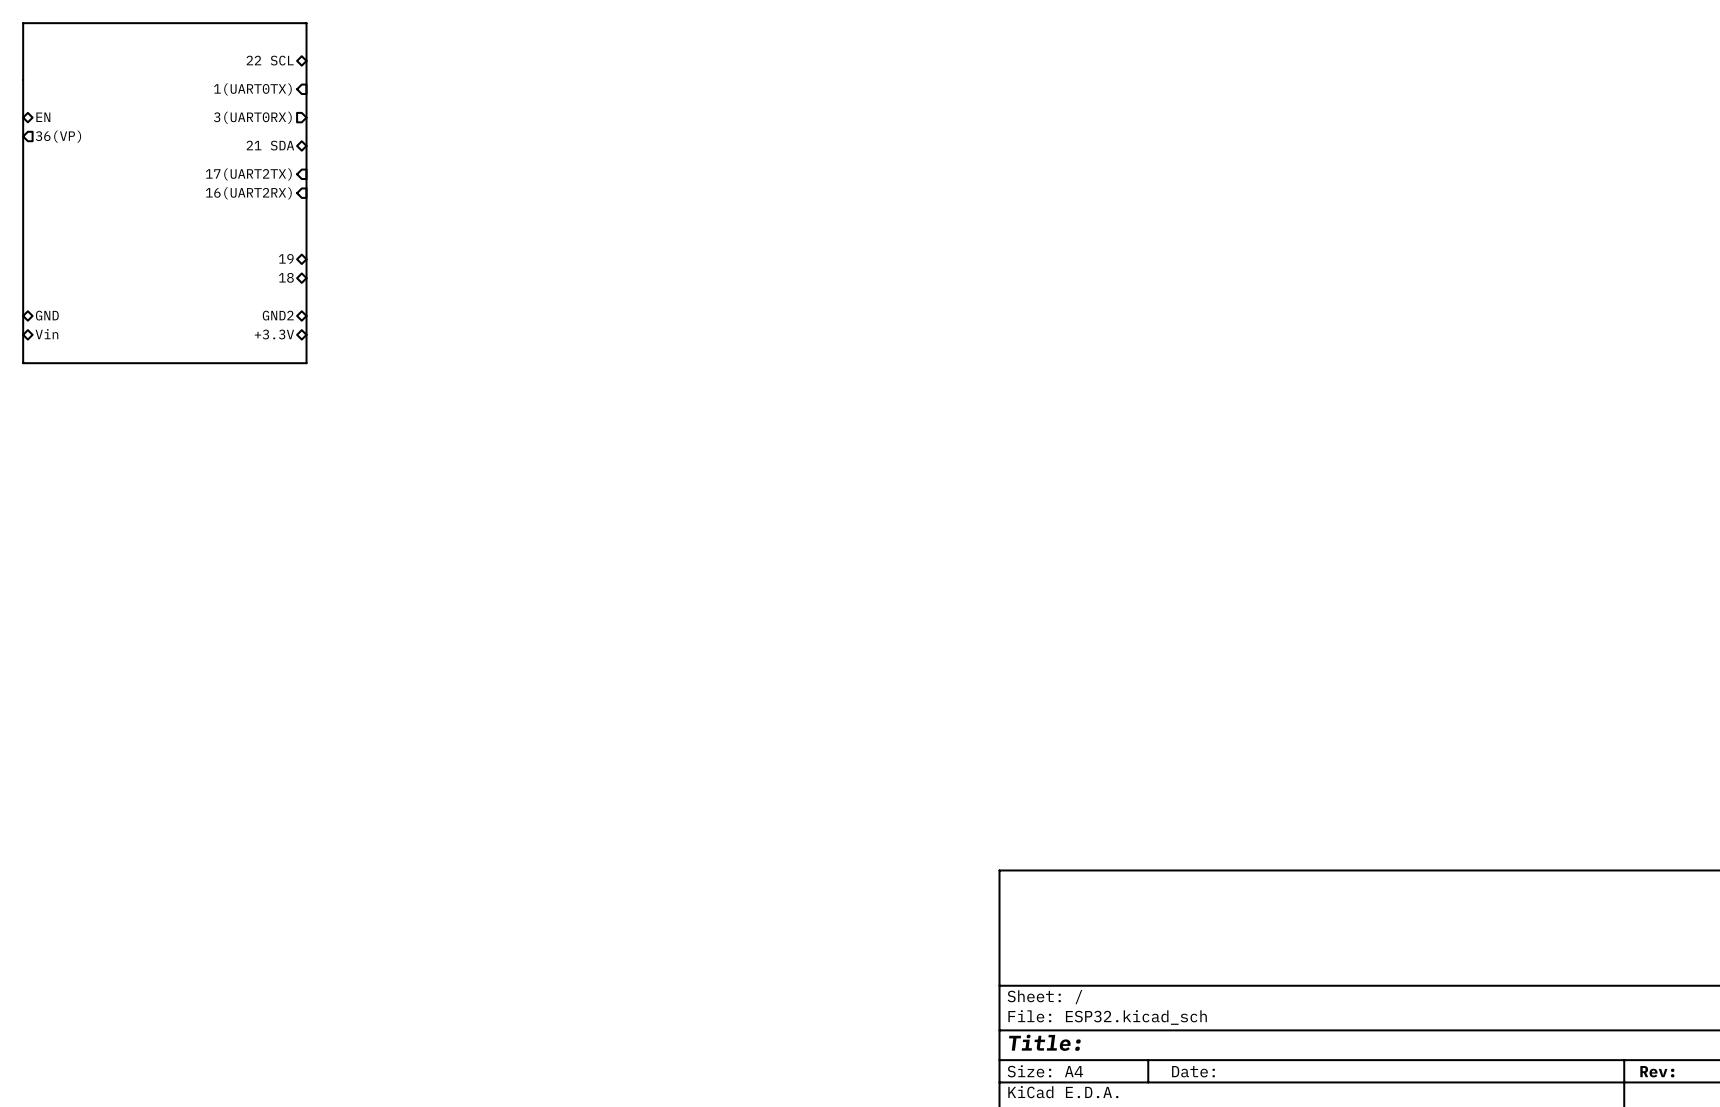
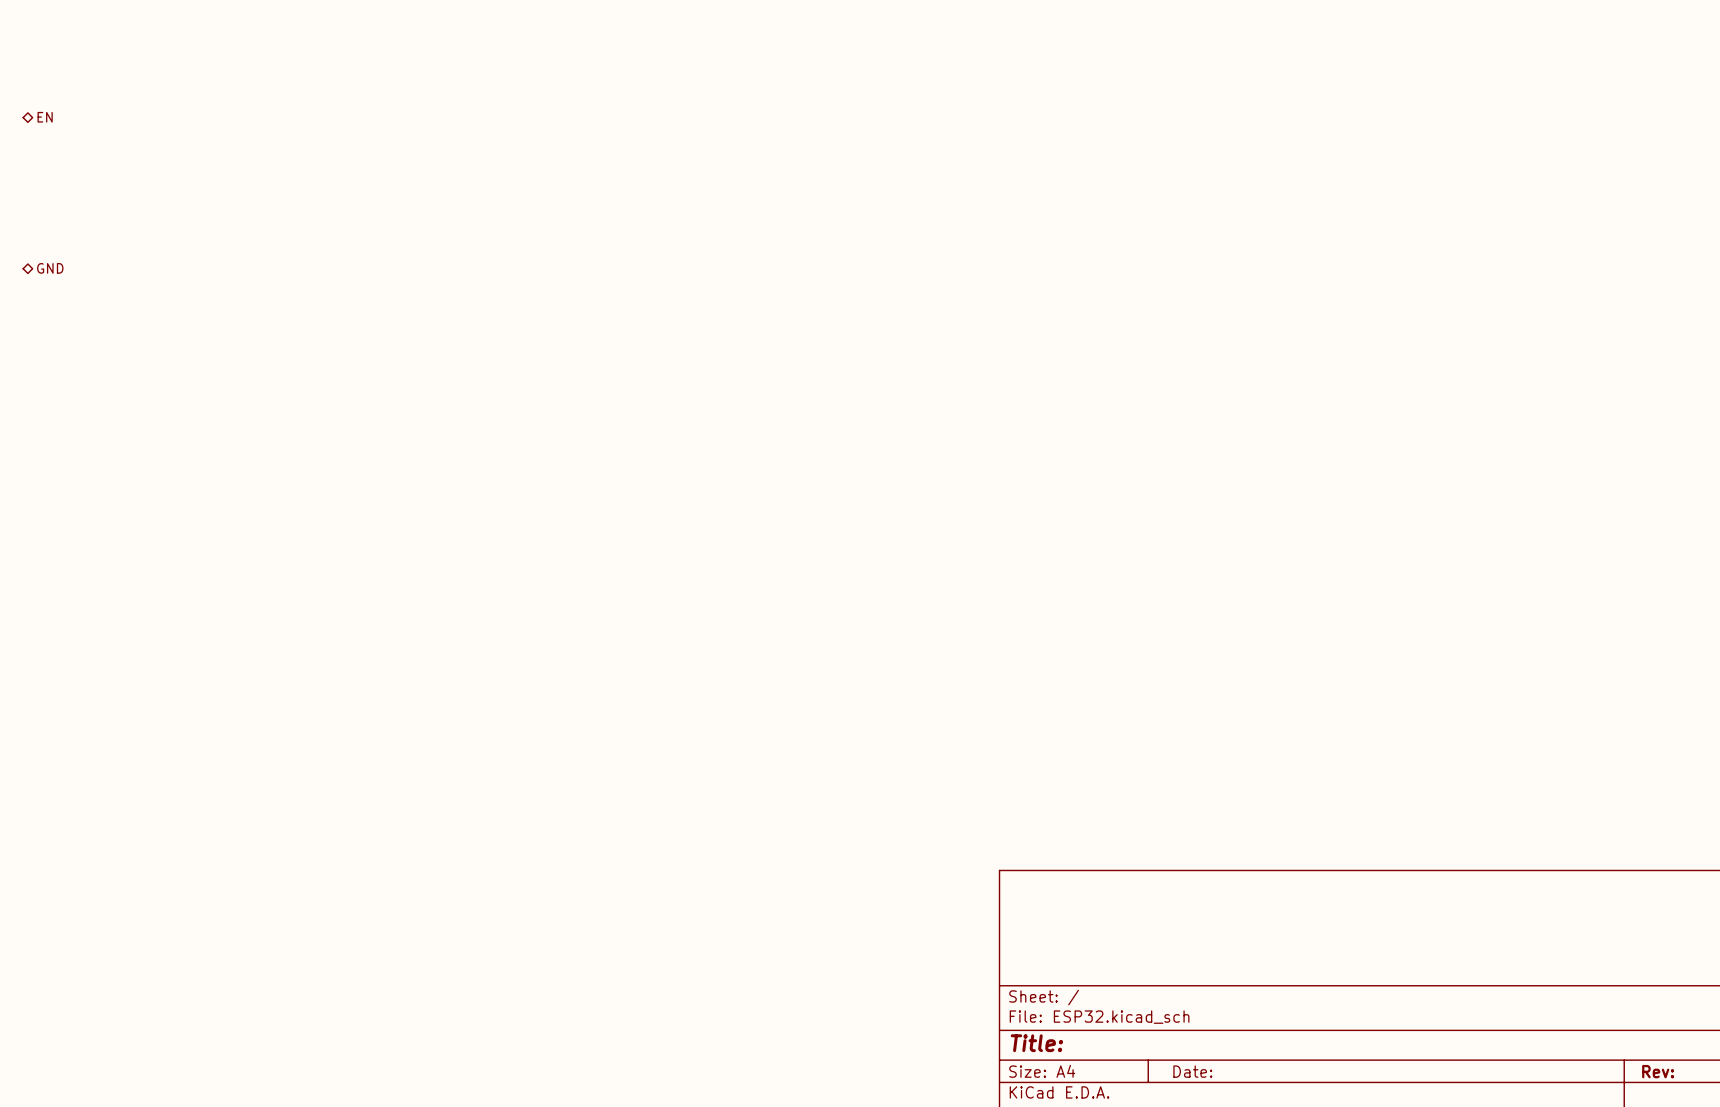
line: (23, 23) (306, 23) (306, 363) (23, 363) (23, 23) -> none
hierarchical label: 22 SCL (270, 60) -> none
hierarchical label: 1(UART0TX) (252, 89) -> none
hierarchical label: 3(UART0RX) (252, 117) -> none
hierarchical label: 36(VP) (58, 136) -> none
hierarchical label: 21 SDA (270, 145) -> none
hierarchical label: 17(UART2TX) (248, 174) -> none
hierarchical label: 16(UART2RX) (248, 193) -> none
hierarchical label: 19 (286, 258) -> none
hierarchical label: 18 (286, 277) -> none
hierarchical label position: GND (47, 315) -> GND (50, 268)
hierarchical label: GND2 (278, 315) -> none
hierarchical label: Vin (46, 334) -> none
hierarchical label: +3.3V (274, 334) -> none

